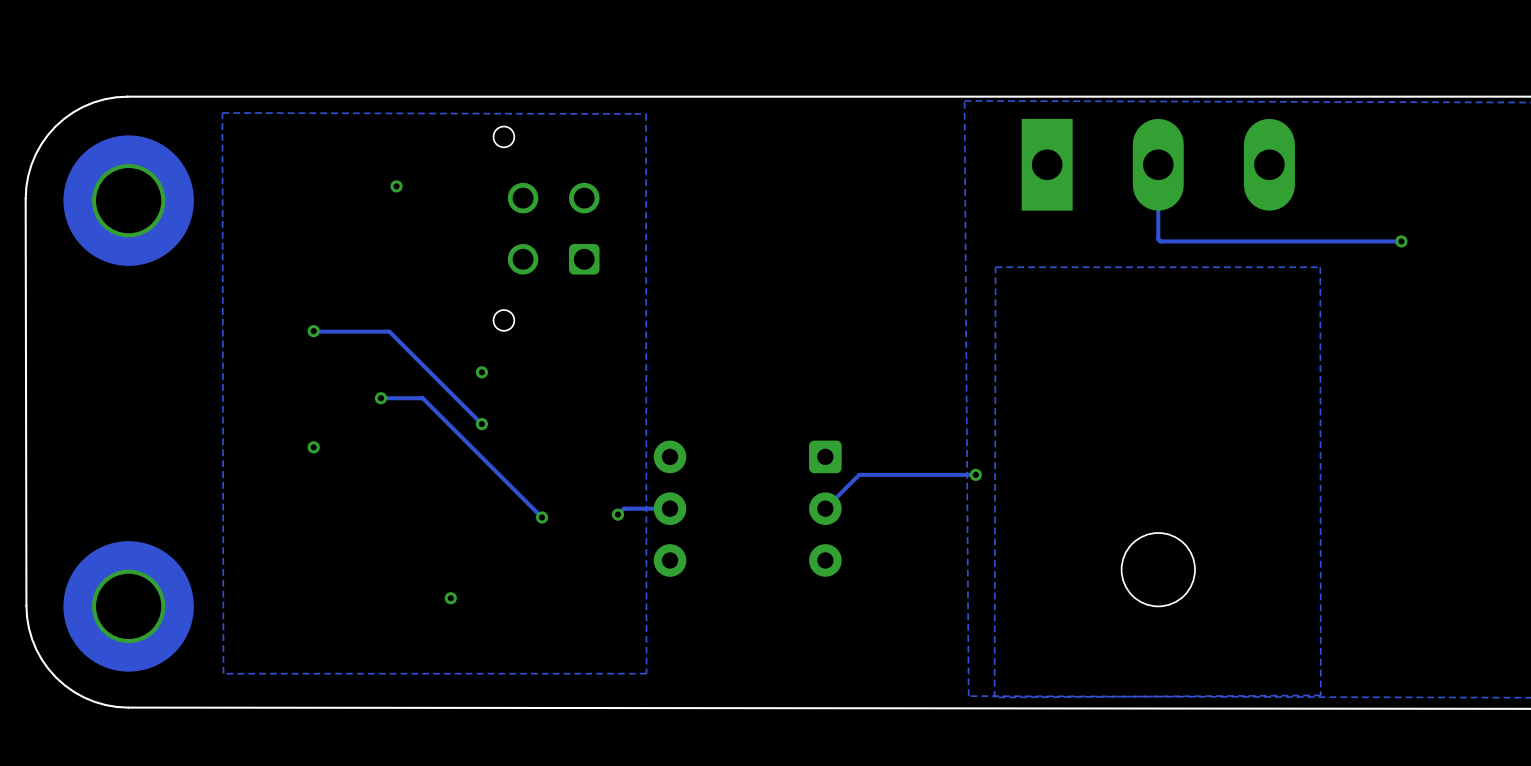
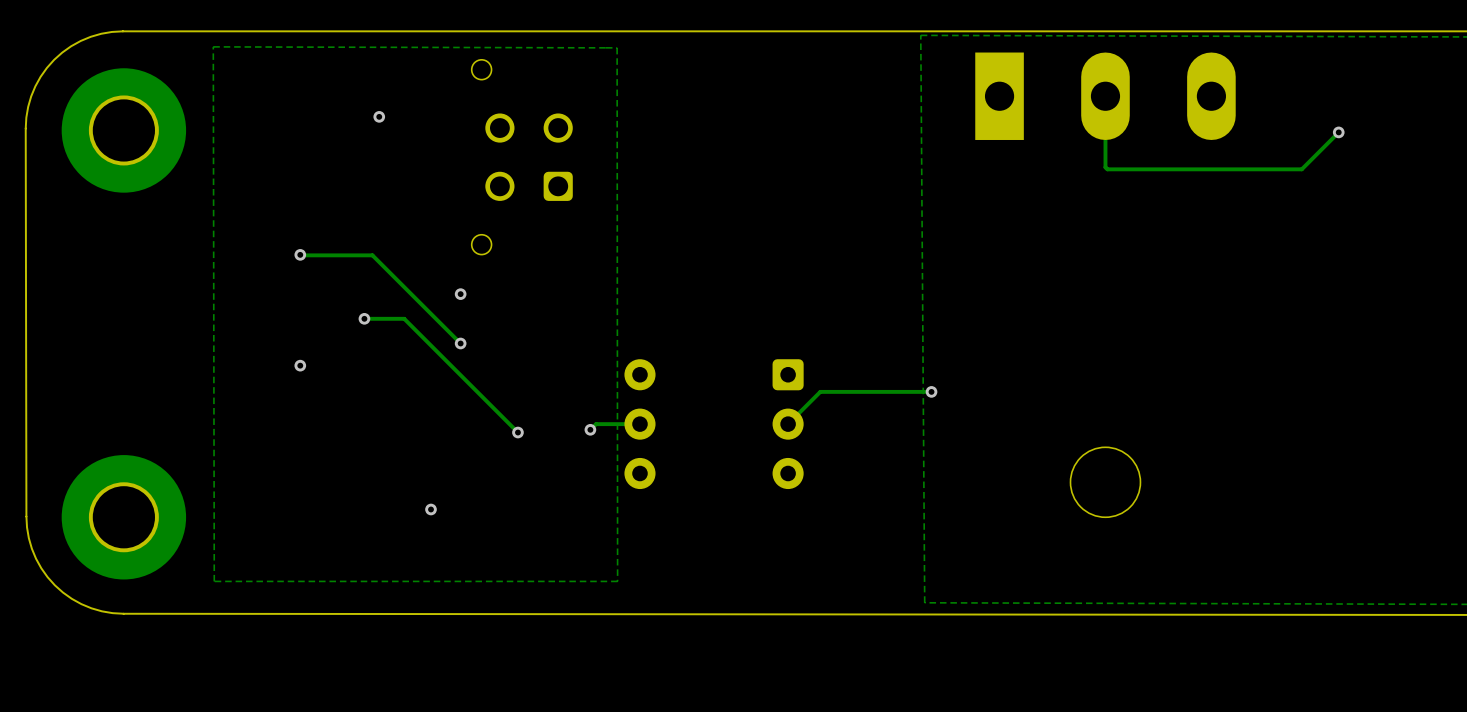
track: (1401, 241) (1364, 241) -> (1338, 132) (1301, 169)
via position: (1401, 241) -> (1338, 132)
zone outline: (1320, 267) (1320, 695) (994, 697) (995, 267) (1320, 267) -> none

